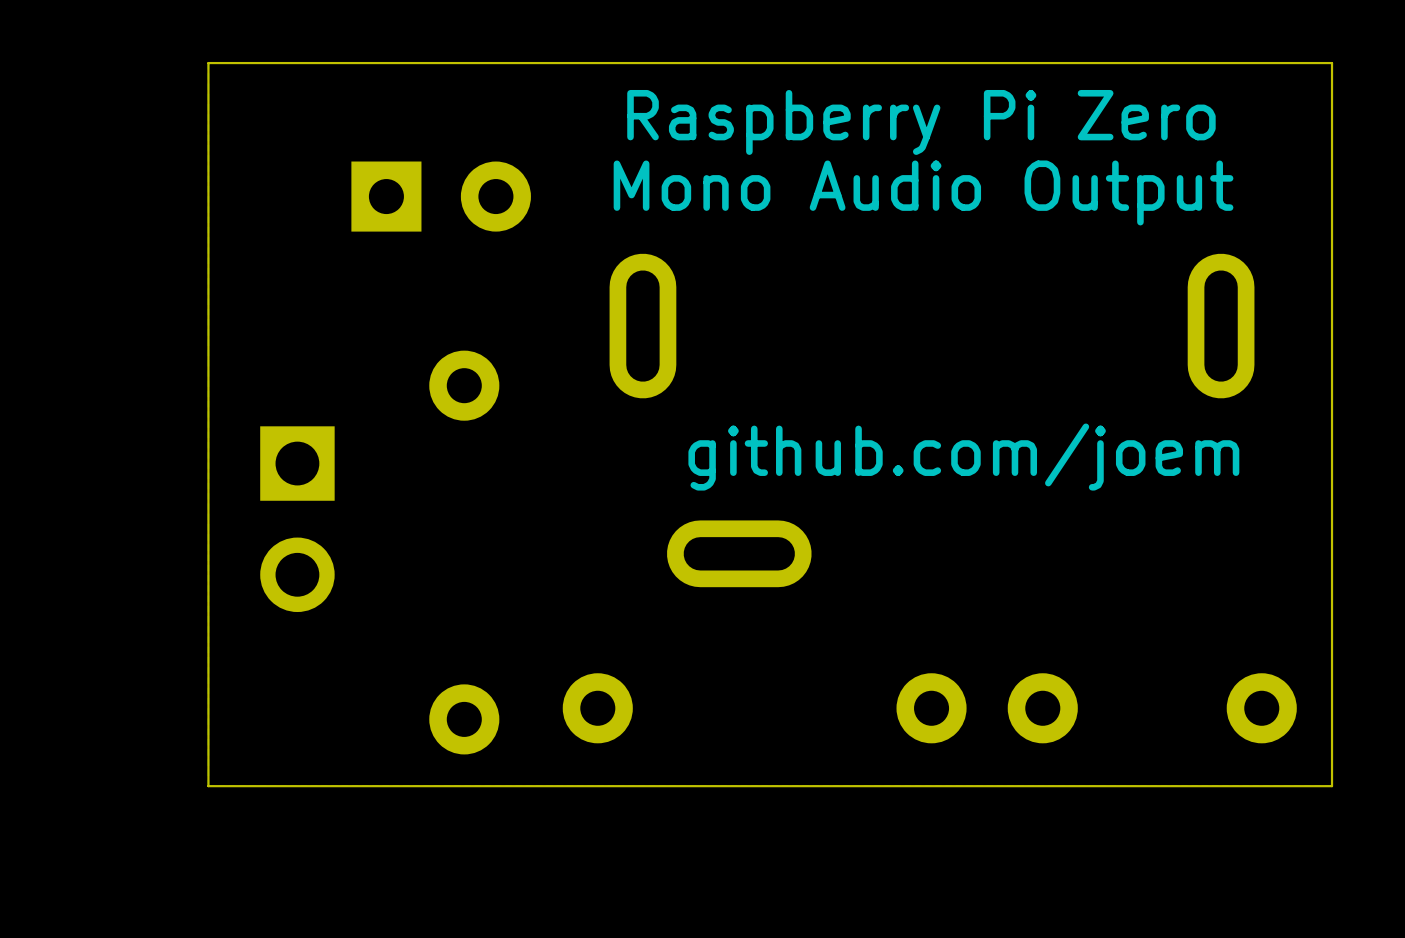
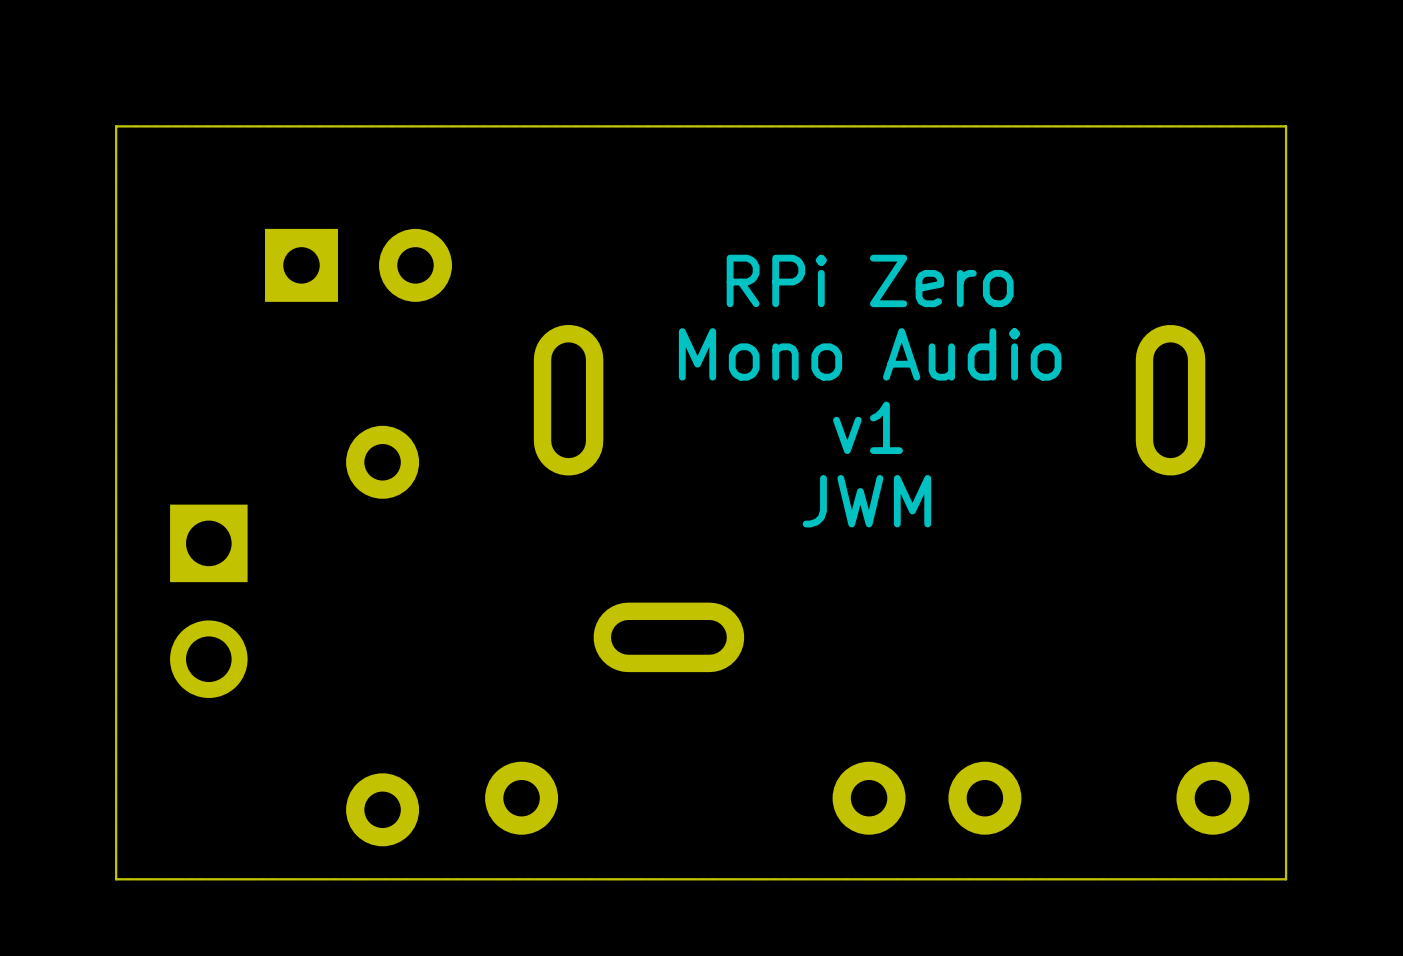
text: Raspberry Pi Zero (921, 122) -> none
text: Mono Audio Output (923, 192) -> RPi Zero (870, 280)
text: none -> Mono Audio (870, 354)
text: none -> v1 (867, 427)
text: github.com/joem (963, 457) -> JWM (866, 501)

